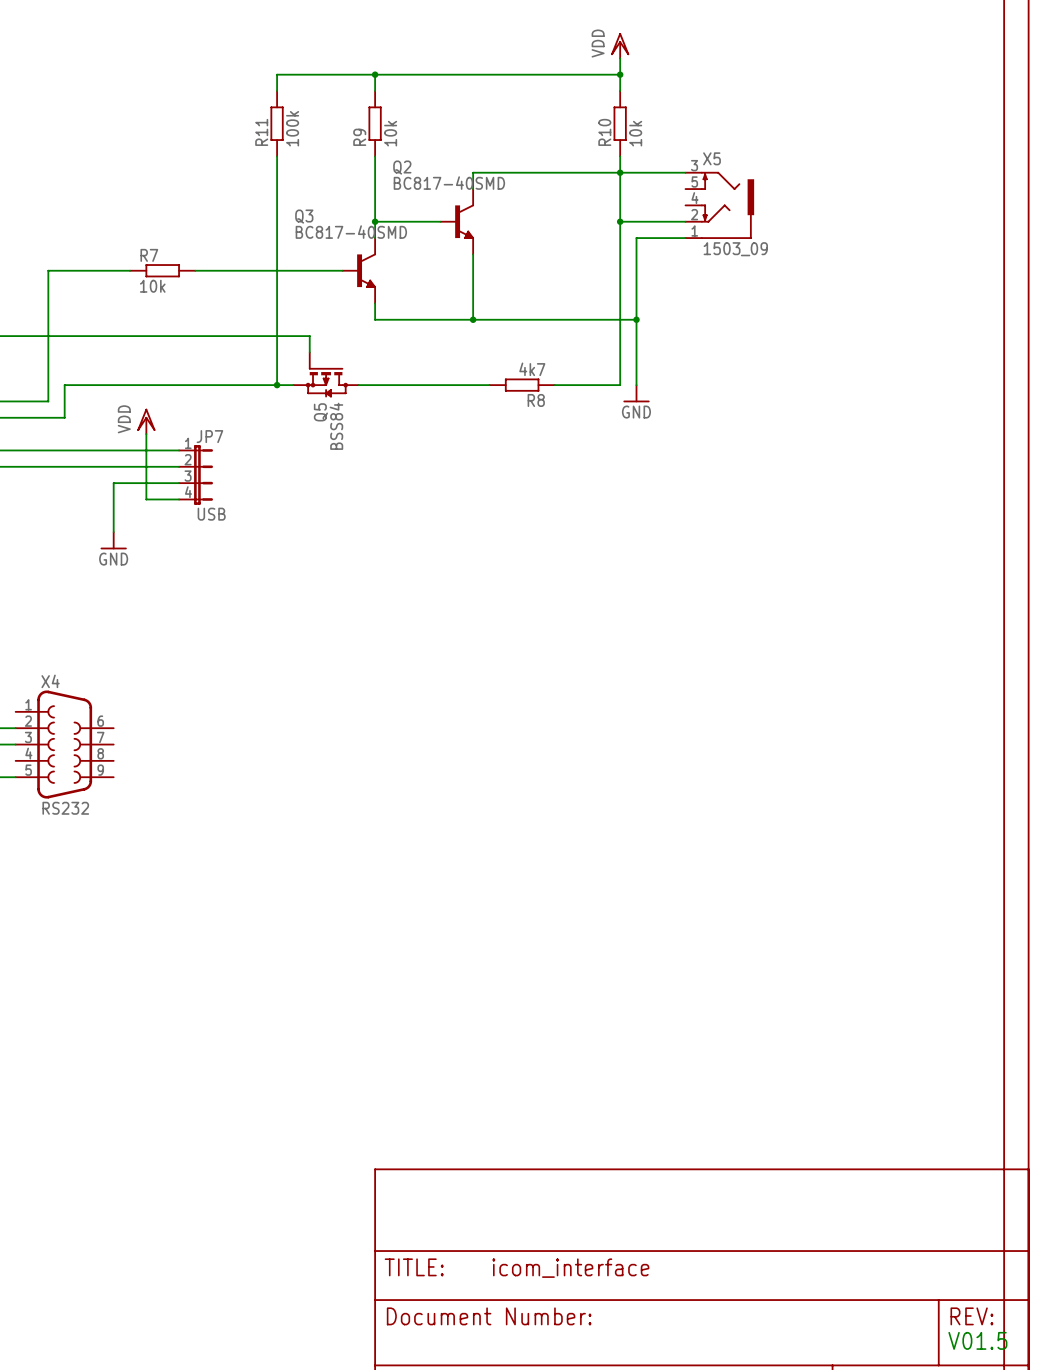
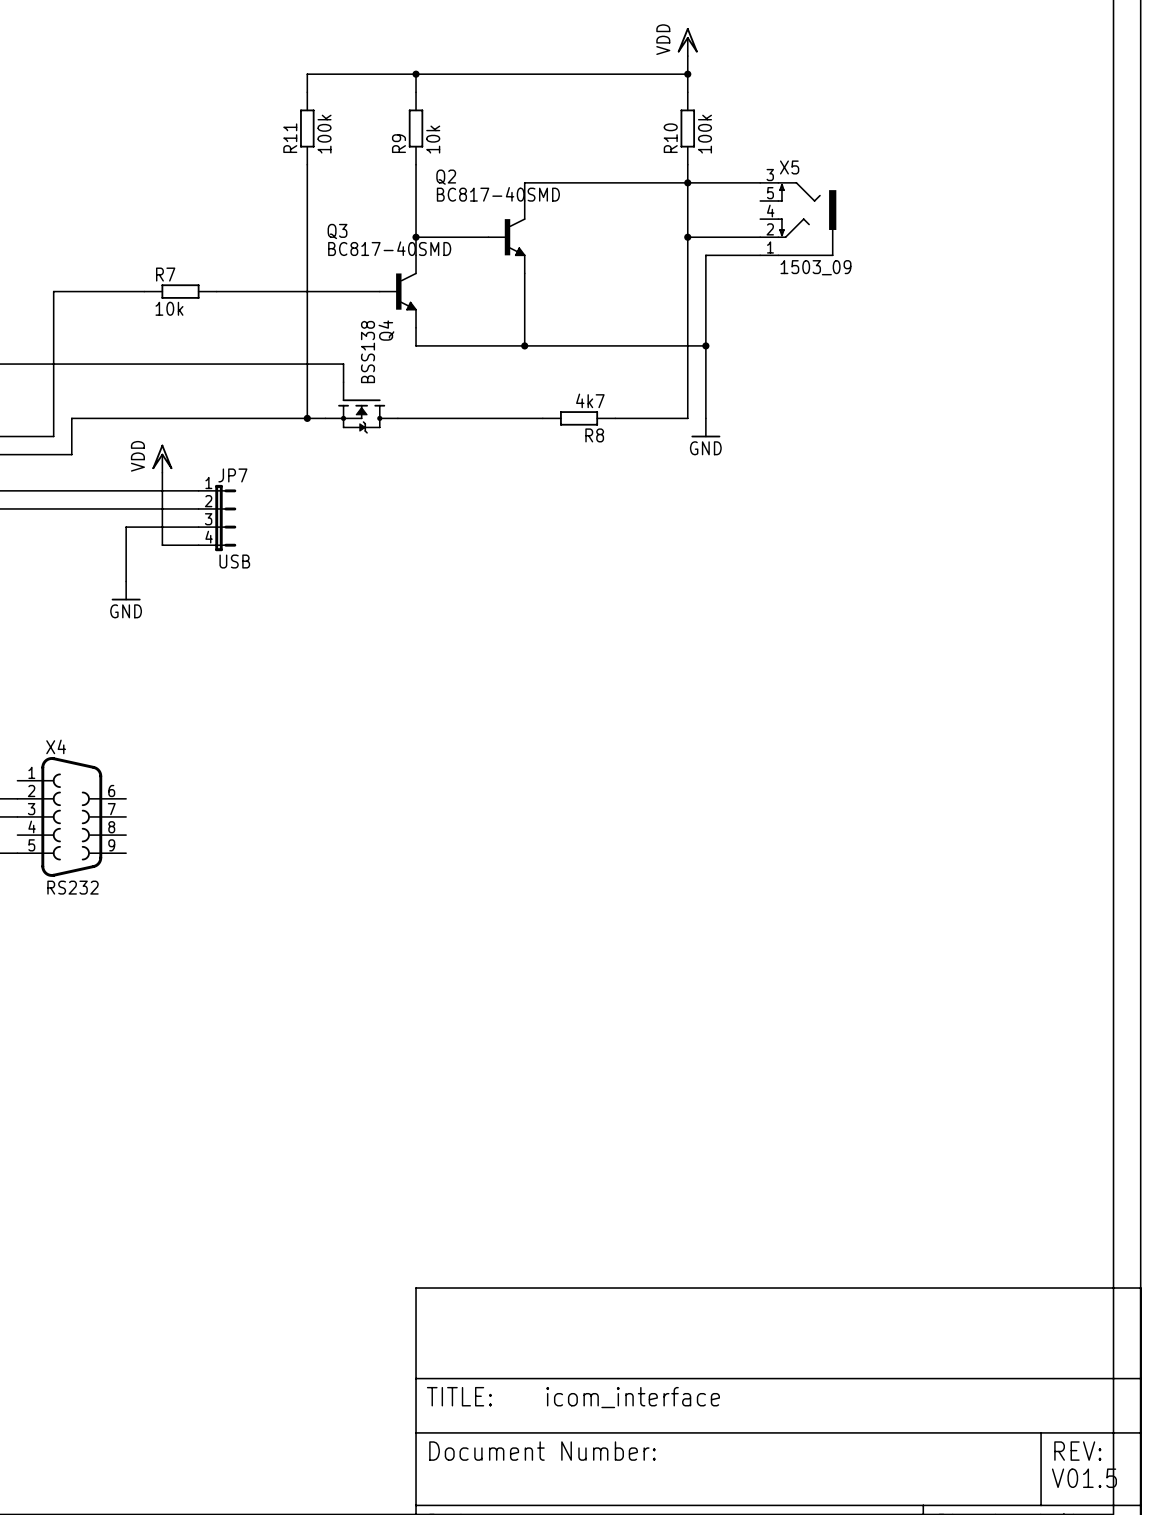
R10 value: 10k (635, 133) -> 100k (704, 134)
Q5: BSS84 (326, 374) -> none
Q4: none -> BSS138 (361, 407)

